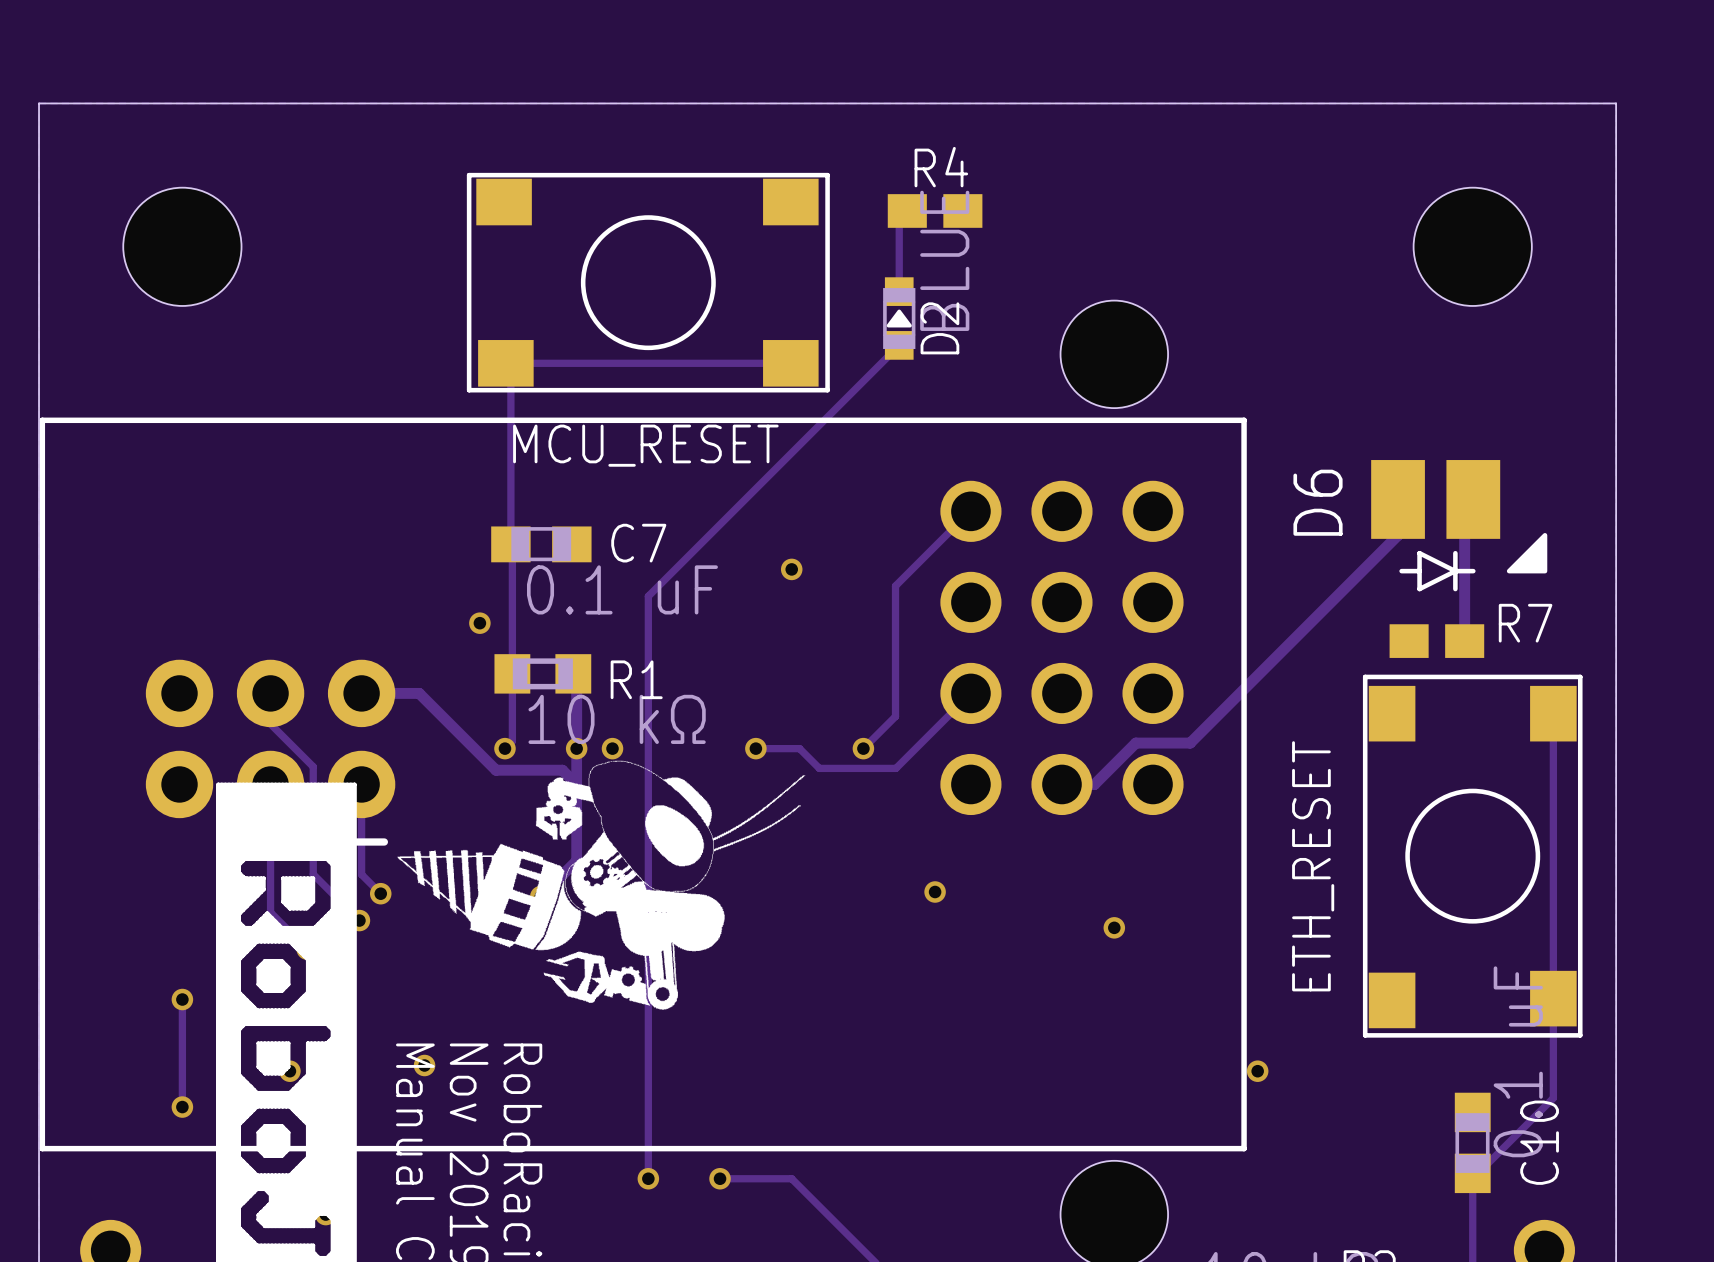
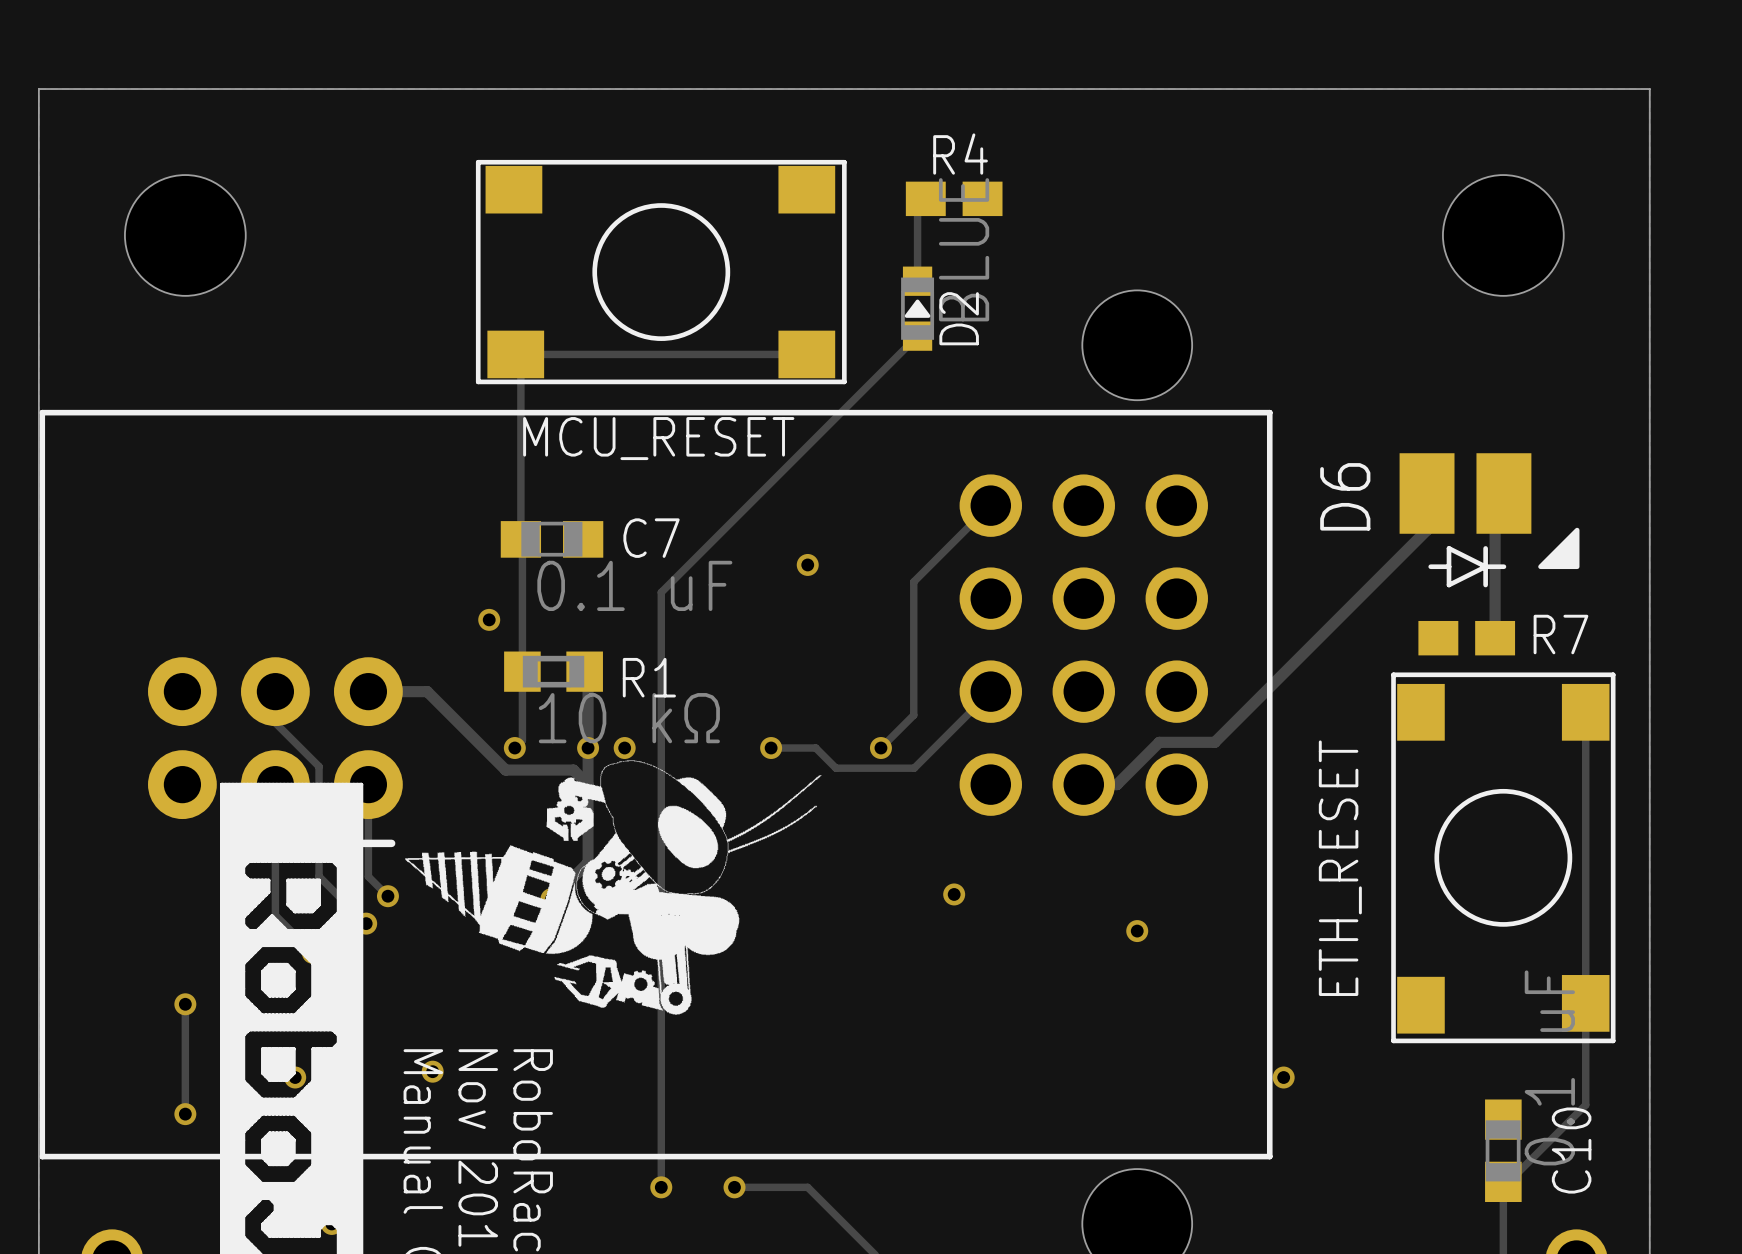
R7 name position: R7 (1525, 623) -> R7 (1560, 634)

